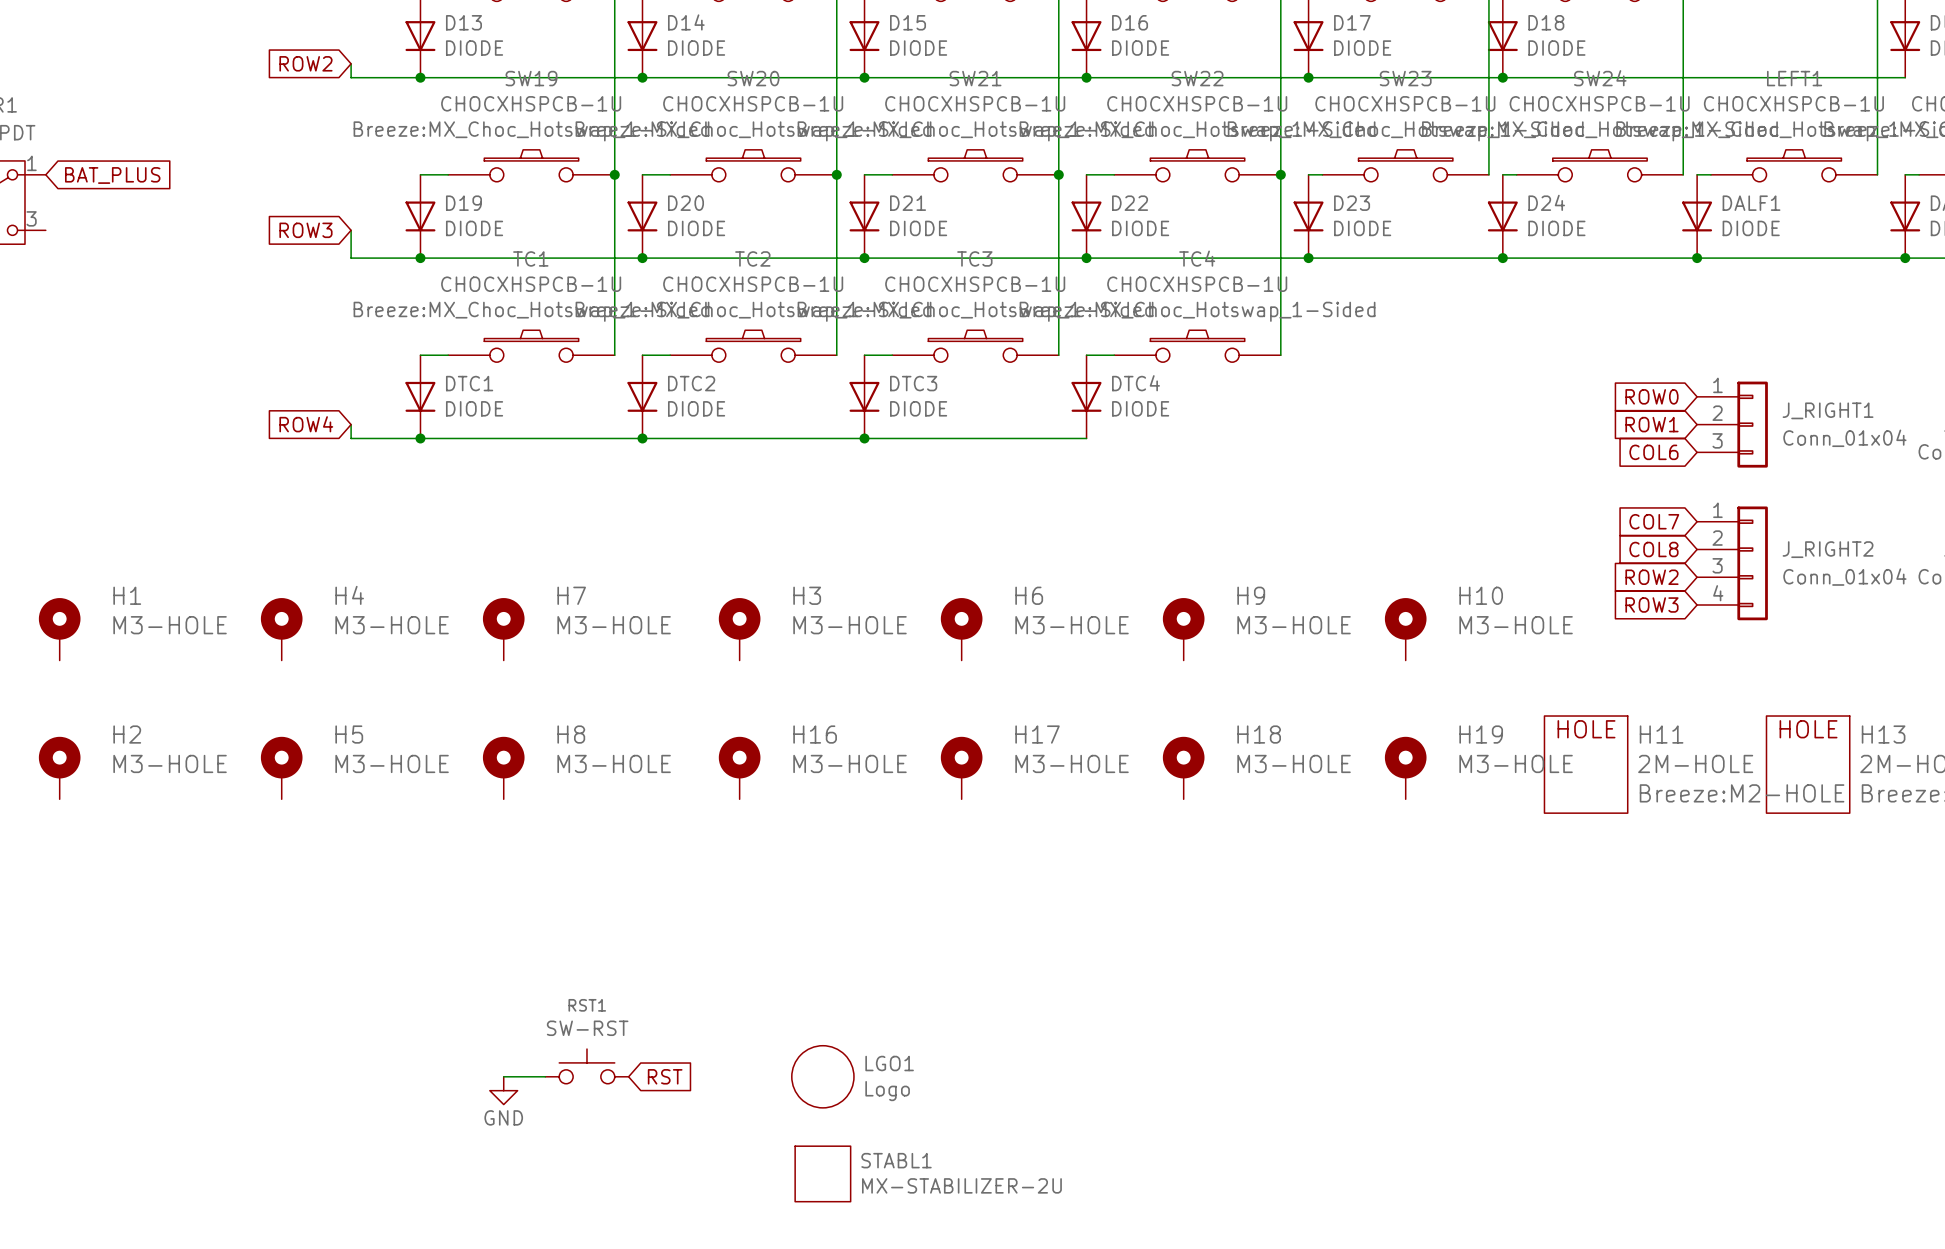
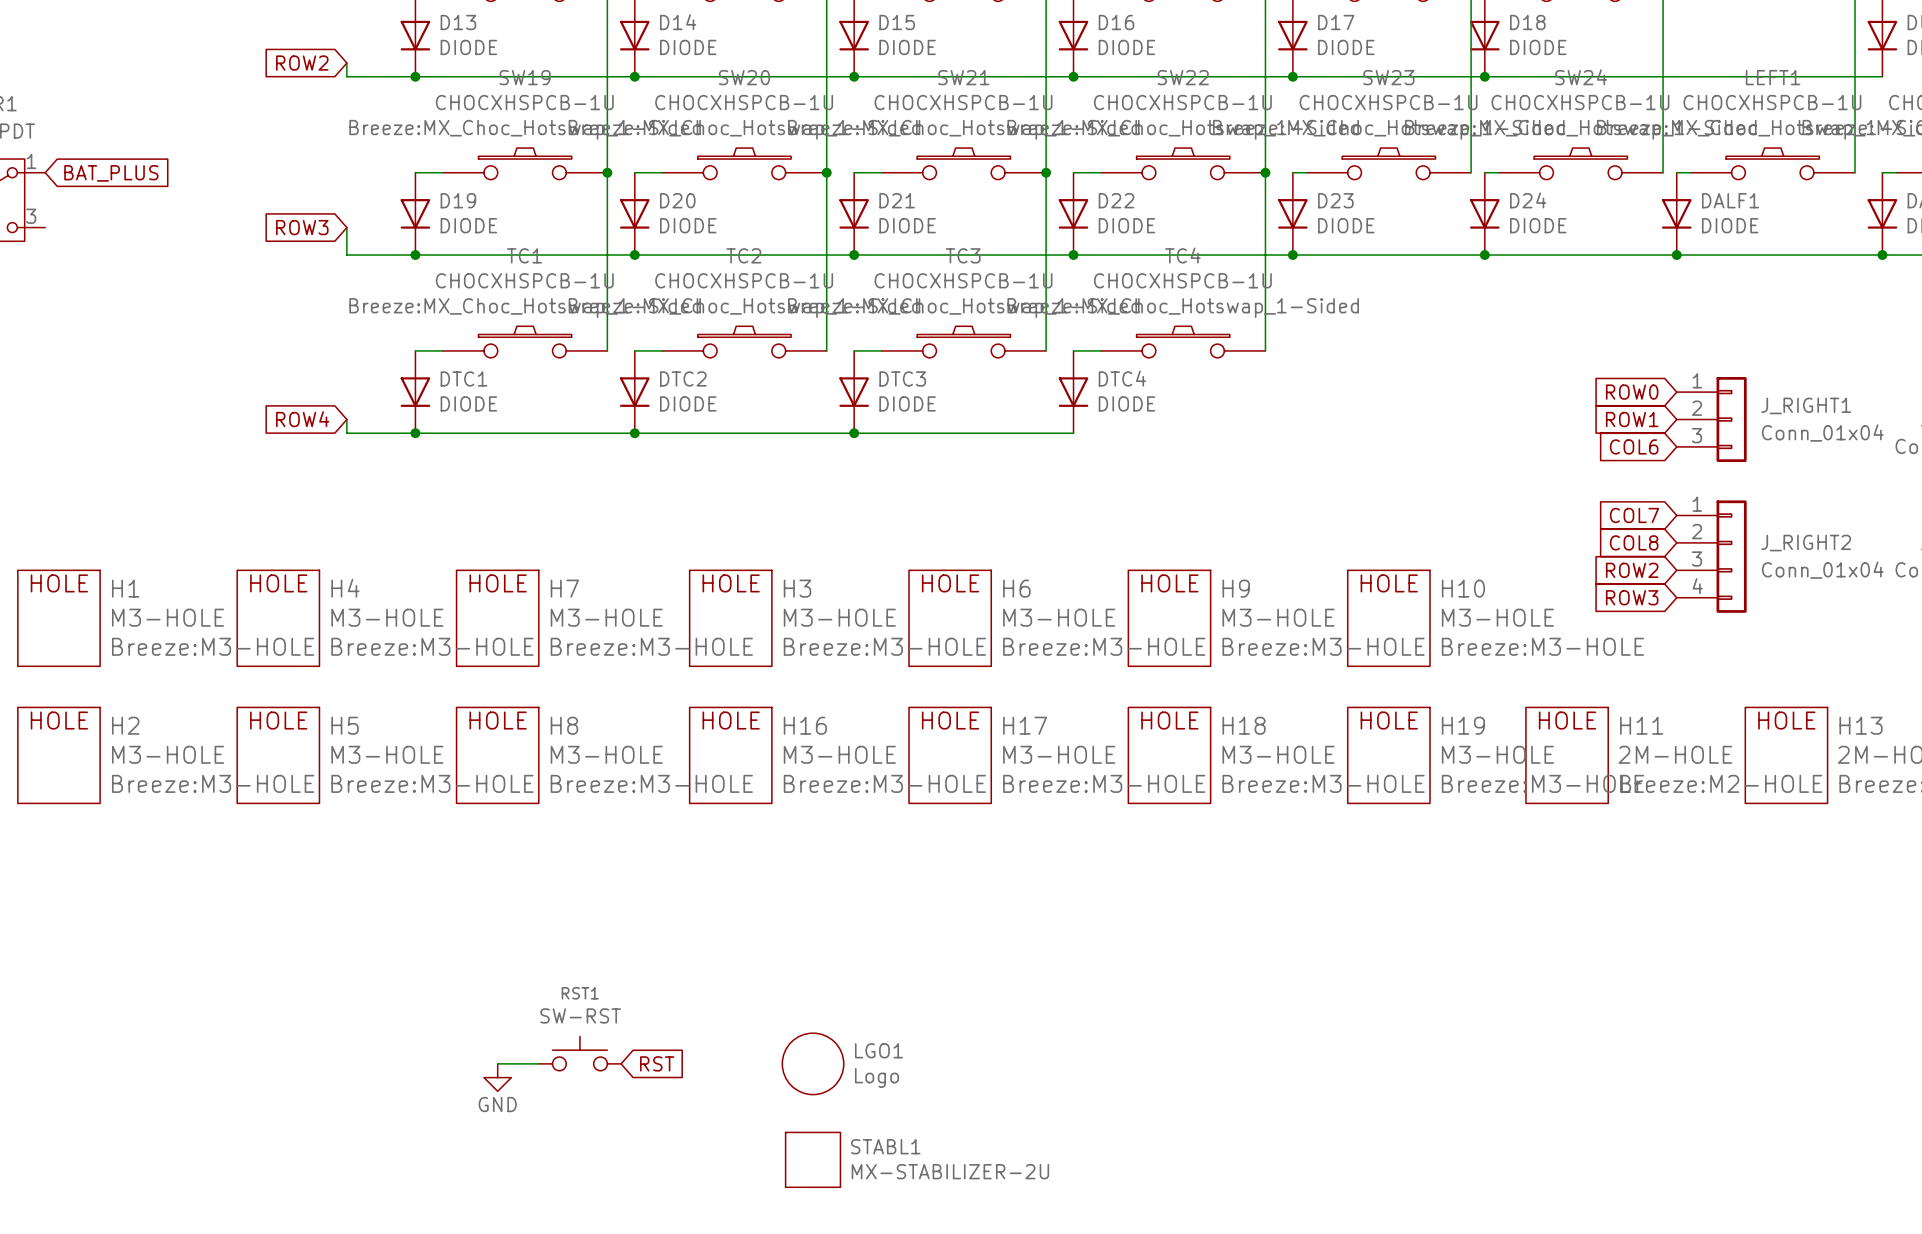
H1 symbol: [38, 598, 81, 661] -> [17, 570, 101, 667]
H4 symbol: [260, 598, 303, 661] -> [237, 570, 320, 667]
H7 symbol: [482, 598, 525, 661] -> [456, 570, 539, 667]
H3 symbol: [718, 598, 761, 661] -> [689, 570, 772, 667]
H6 symbol: [940, 598, 983, 661] -> [909, 570, 992, 667]
H9 symbol: [1162, 598, 1205, 661] -> [1128, 570, 1211, 667]
H10 symbol: [1384, 598, 1427, 661] -> [1347, 570, 1430, 667]
H1 text: none -> Breeze:M3-HOLE (213, 646)
H4 text: none -> Breeze:M3-HOLE (432, 646)
H7 text: none -> Breeze:M3-HOLE (651, 646)
H3 text: none -> Breeze:M3-HOLE (884, 646)
H6 text: none -> Breeze:M3-HOLE (1104, 646)
H9 text: none -> Breeze:M3-HOLE (1323, 646)
H10 text: none -> Breeze:M3-HOLE (1542, 646)
H2 symbol: [38, 736, 81, 800] -> [17, 707, 101, 804]
H5 symbol: [260, 736, 303, 800] -> [237, 707, 320, 804]
H8 symbol: [482, 736, 525, 800] -> [456, 707, 539, 804]
H16 symbol: [718, 736, 761, 800] -> [689, 707, 772, 804]
H17 symbol: [940, 736, 983, 800] -> [909, 707, 992, 804]
H18 symbol: [1162, 736, 1205, 800] -> [1128, 707, 1211, 804]
H19 symbol: [1384, 736, 1427, 800] -> [1347, 707, 1430, 804]
H2 text: none -> Breeze:M3-HOLE (213, 783)
H5 text: none -> Breeze:M3-HOLE (432, 783)
H8 text: none -> Breeze:M3-HOLE (651, 783)
H16 text: none -> Breeze:M3-HOLE (884, 783)
H17 text: none -> Breeze:M3-HOLE (1104, 783)
H18 text: none -> Breeze:M3-HOLE (1323, 783)
H19 text: none -> Breeze:M3-HOLE (1542, 783)

